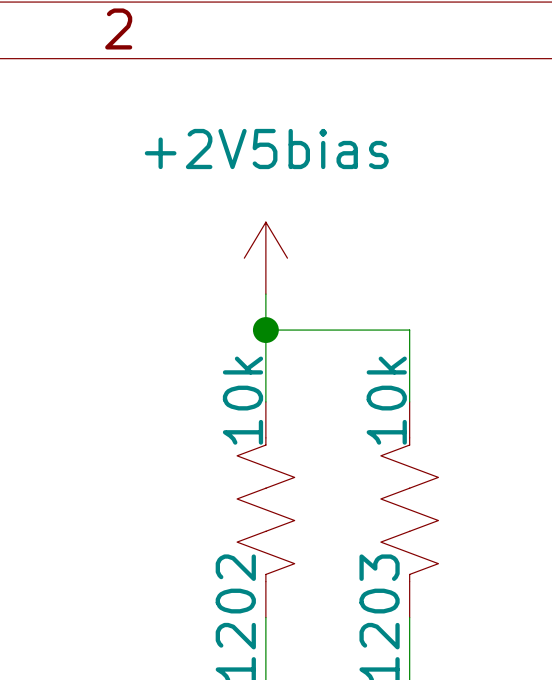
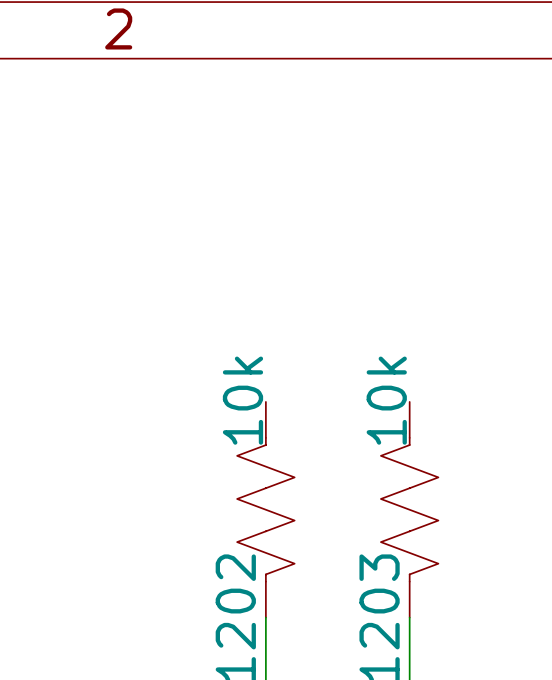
power symbol: +2V5bias (265, 258) -> none
wire: (265, 294) (265, 401) -> none
wire: (265, 330) (409, 330) (409, 401) -> none
junction: (265, 330) -> none

